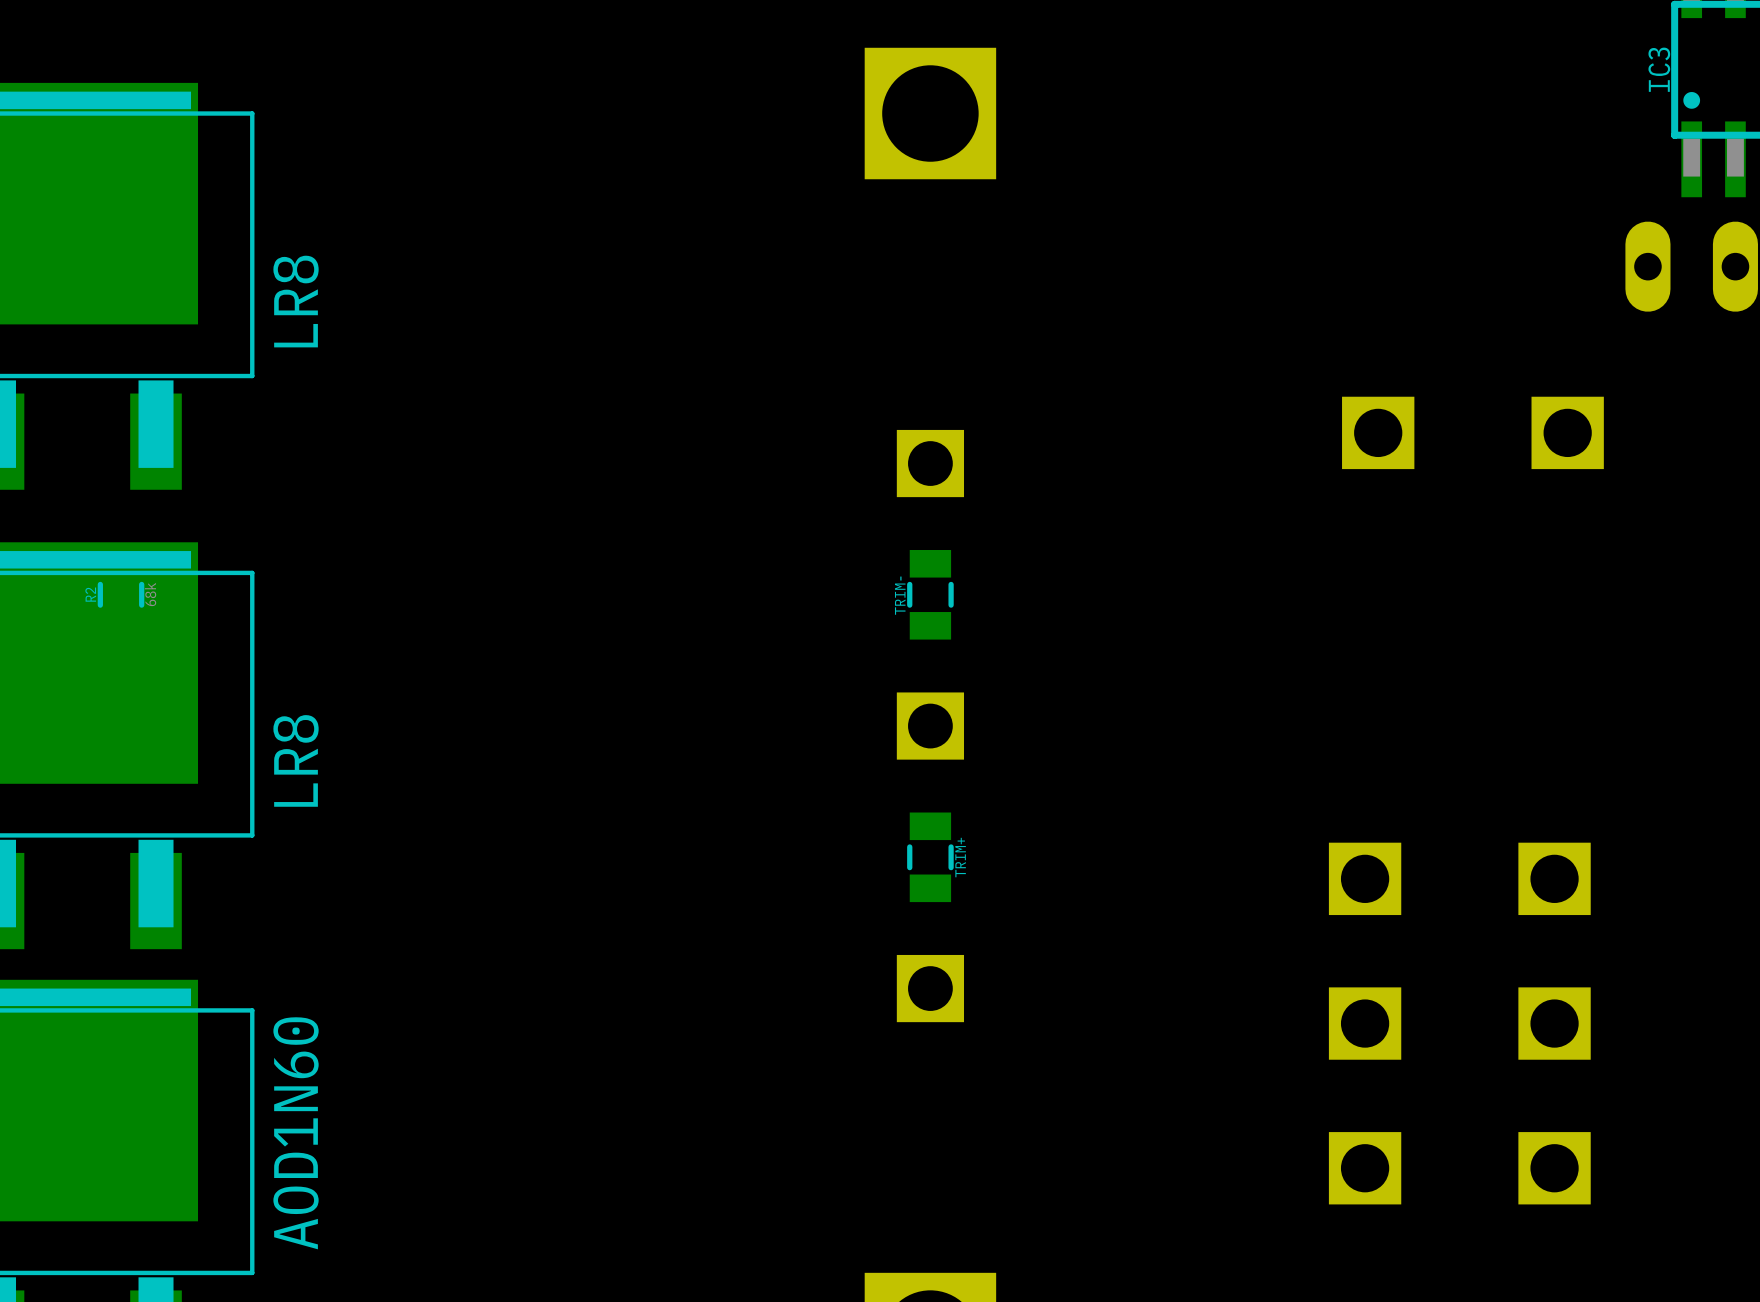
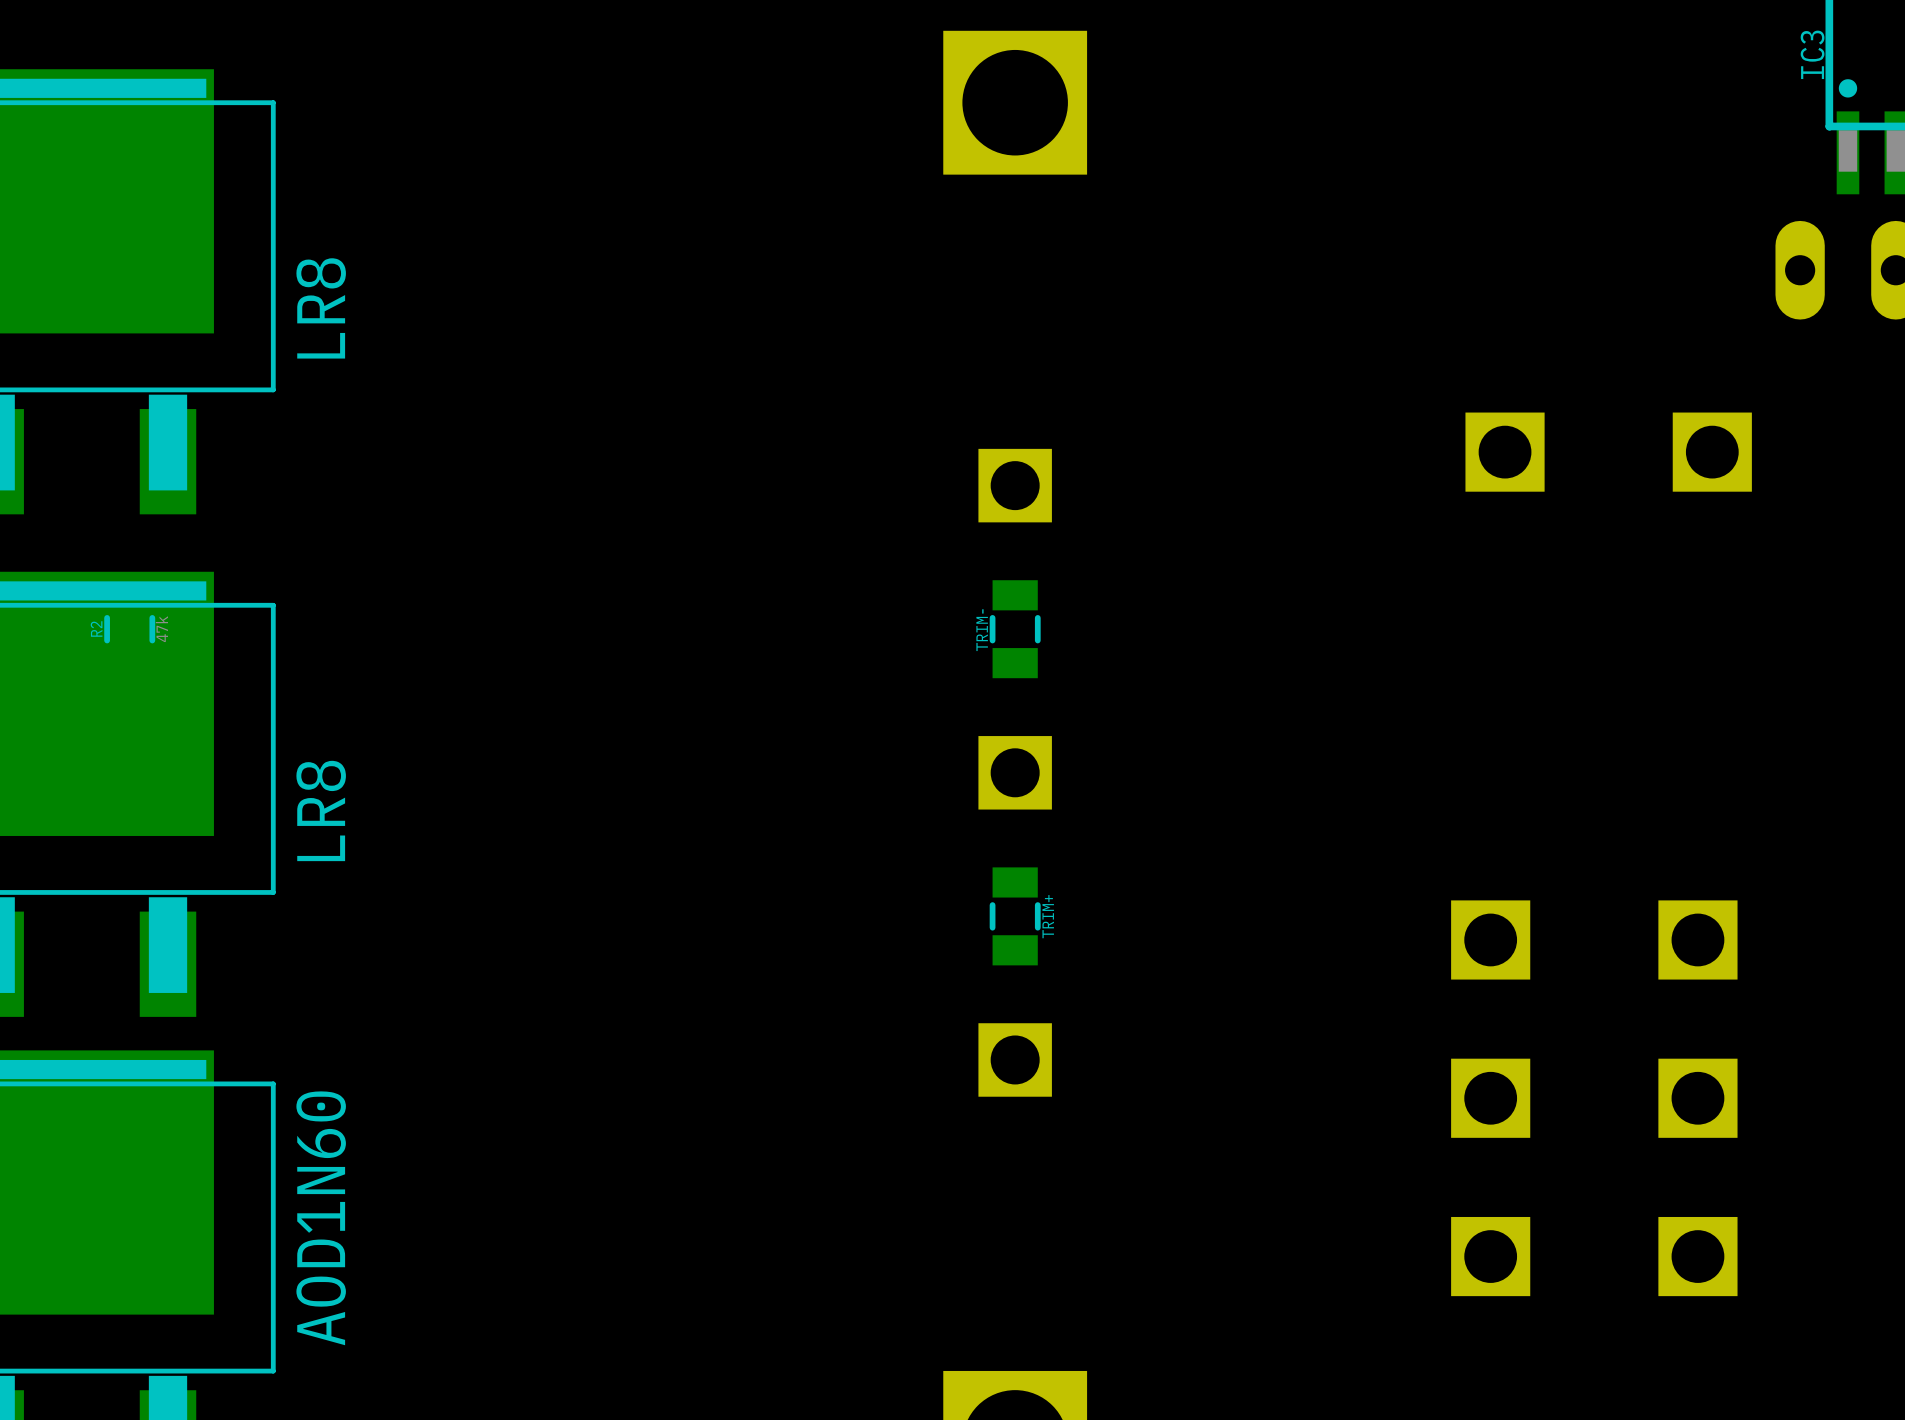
R2 value: 68k (150, 594) -> 47k (161, 629)

